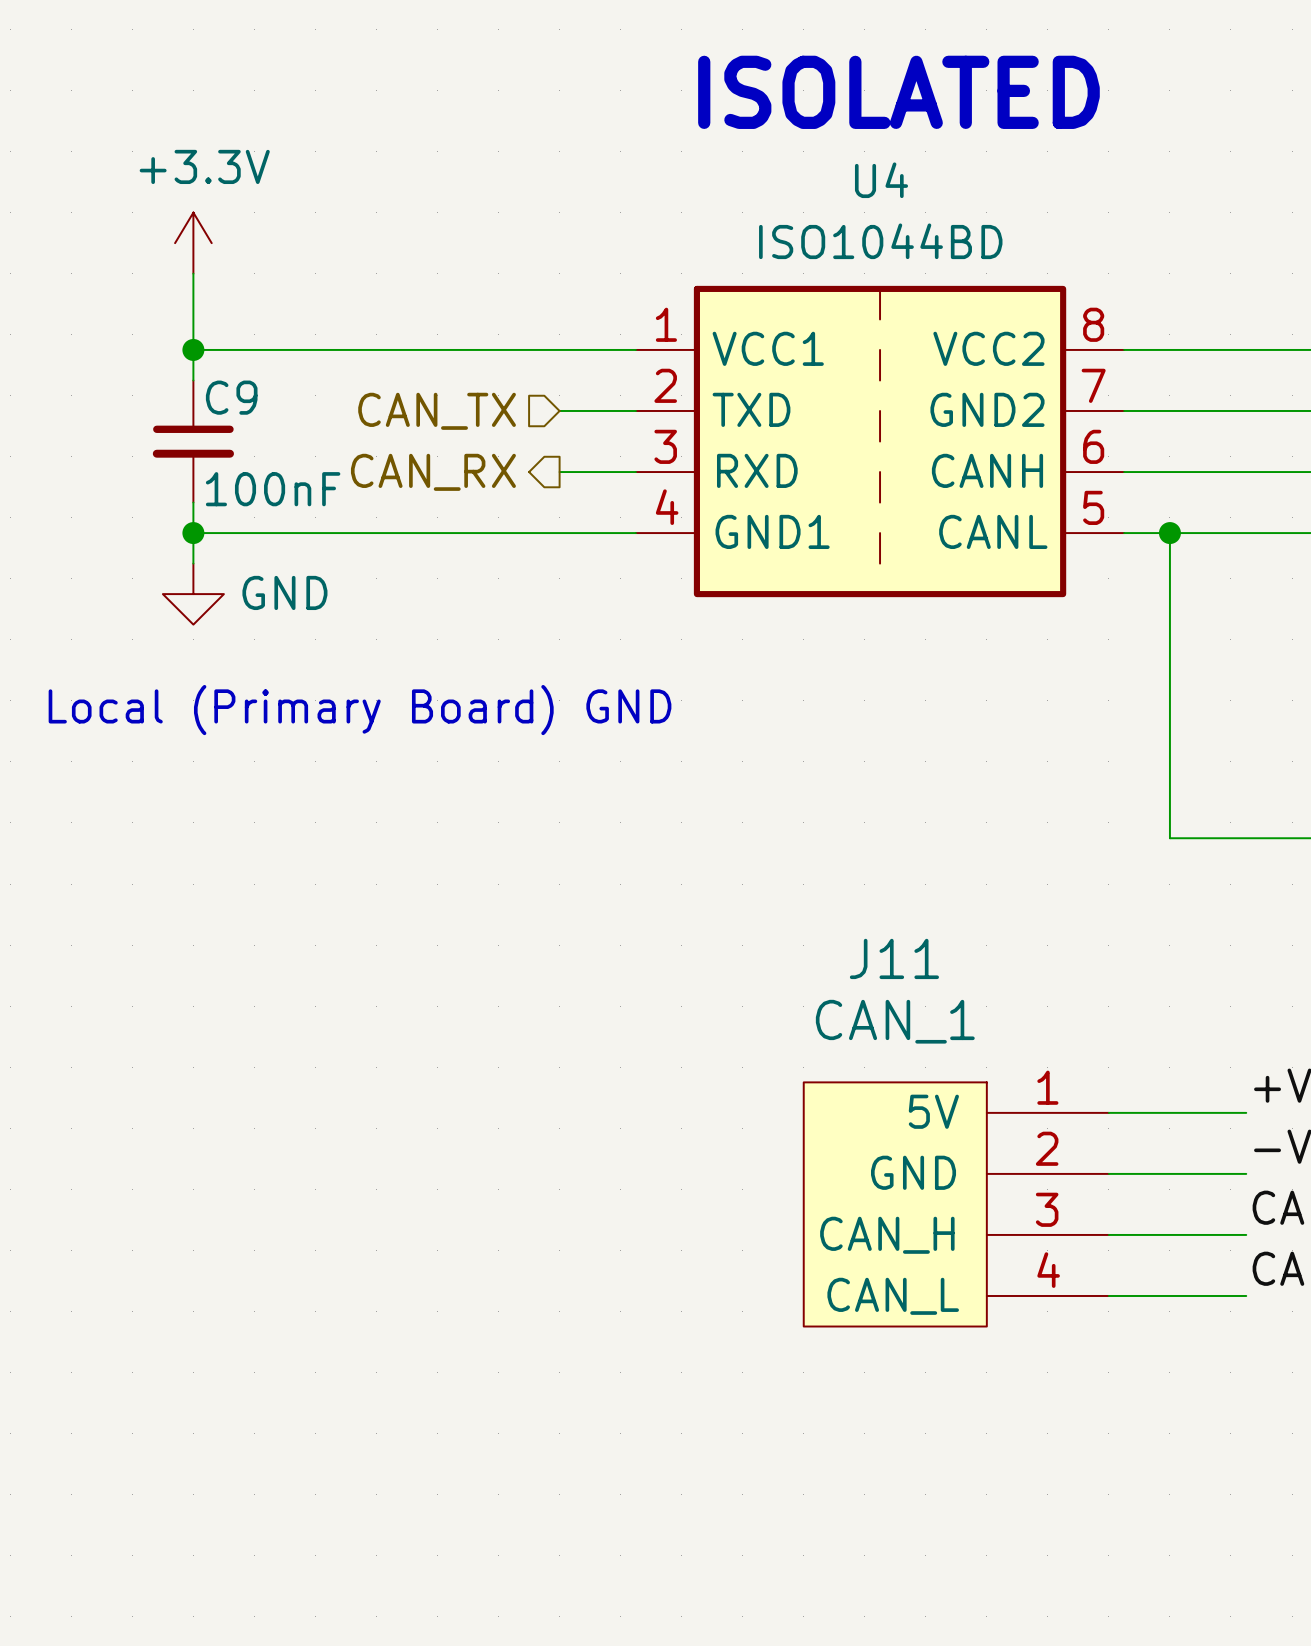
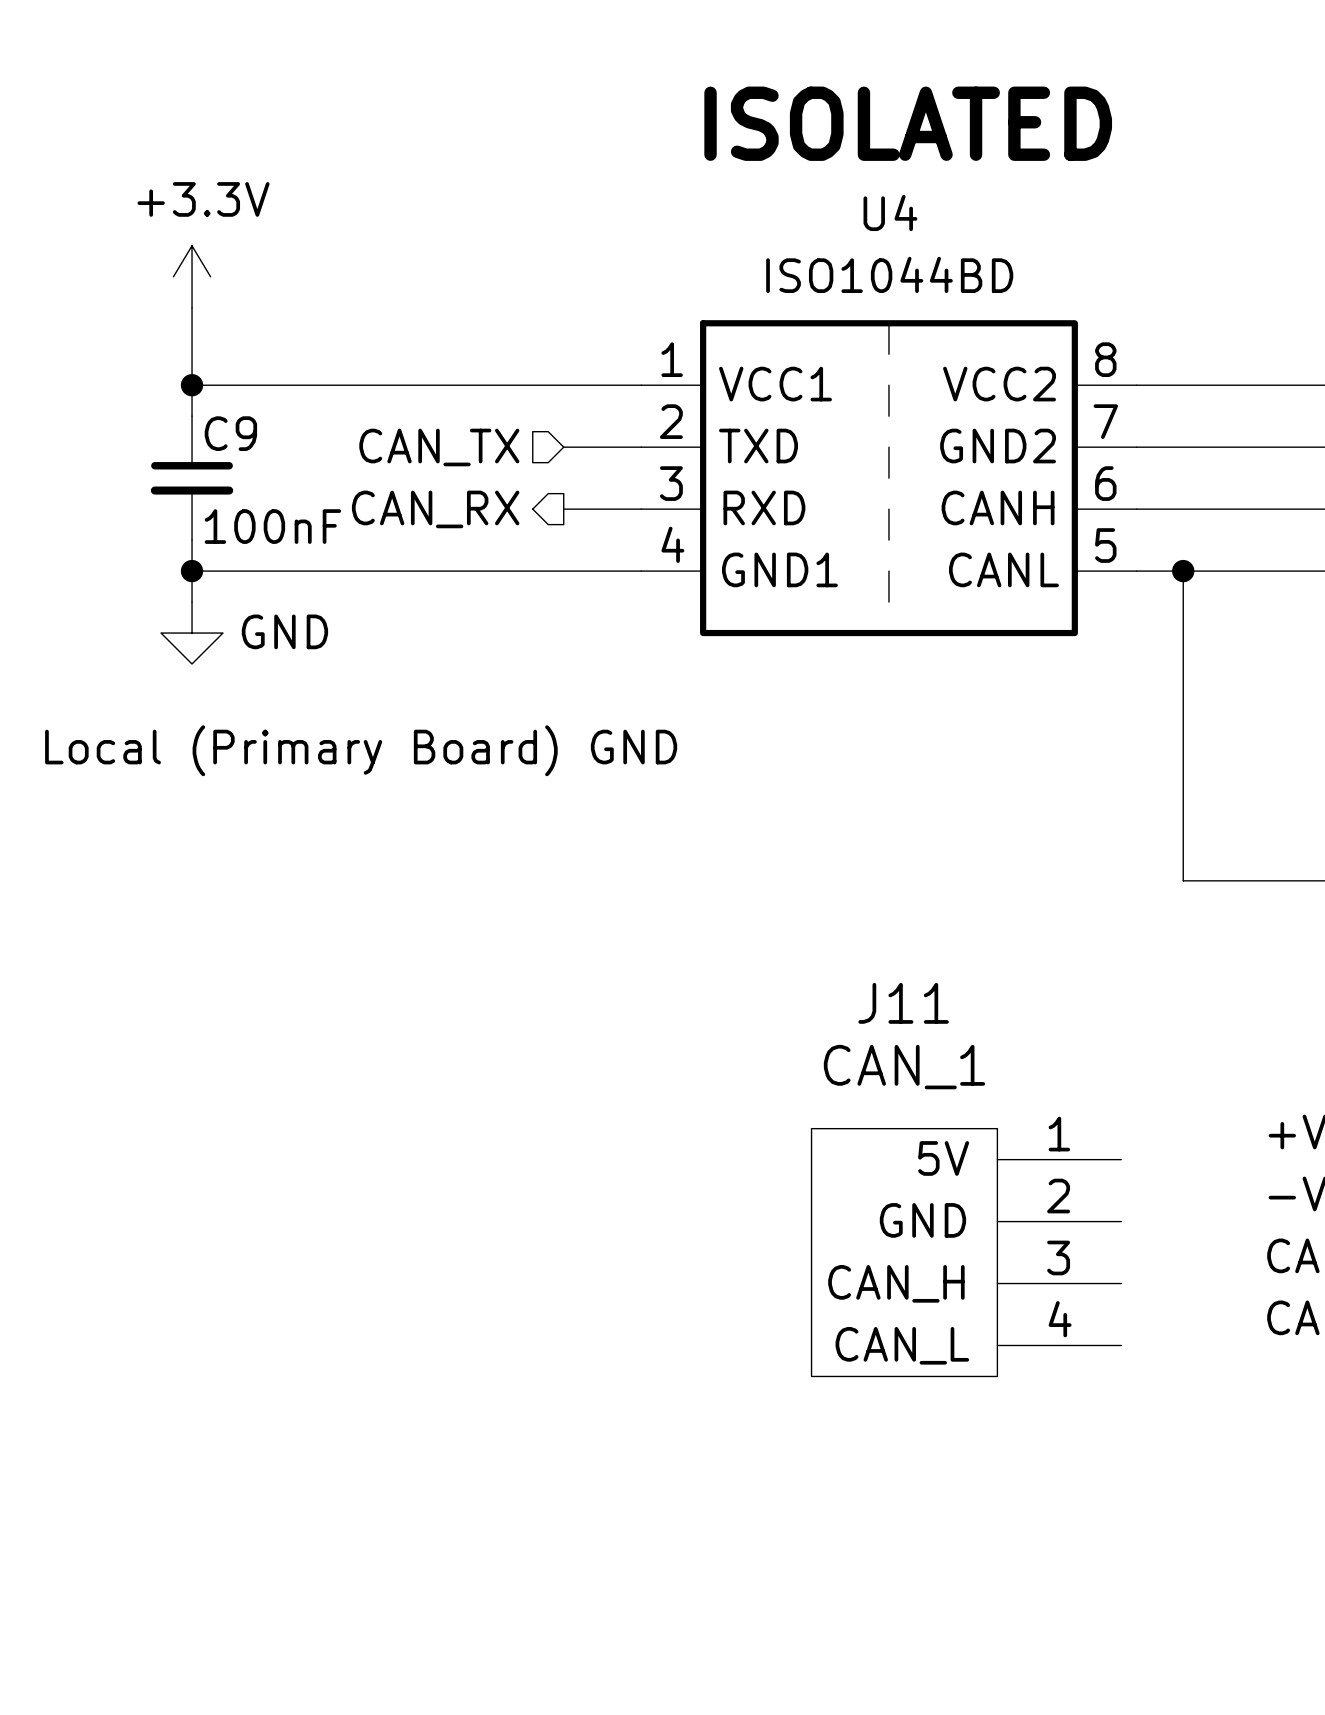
wire: (1108, 1112) (1246, 1112) -> none
wire: (1108, 1173) (1246, 1173) -> none
wire: (1108, 1234) (1246, 1234) -> none
wire: (1108, 1295) (1246, 1295) -> none

